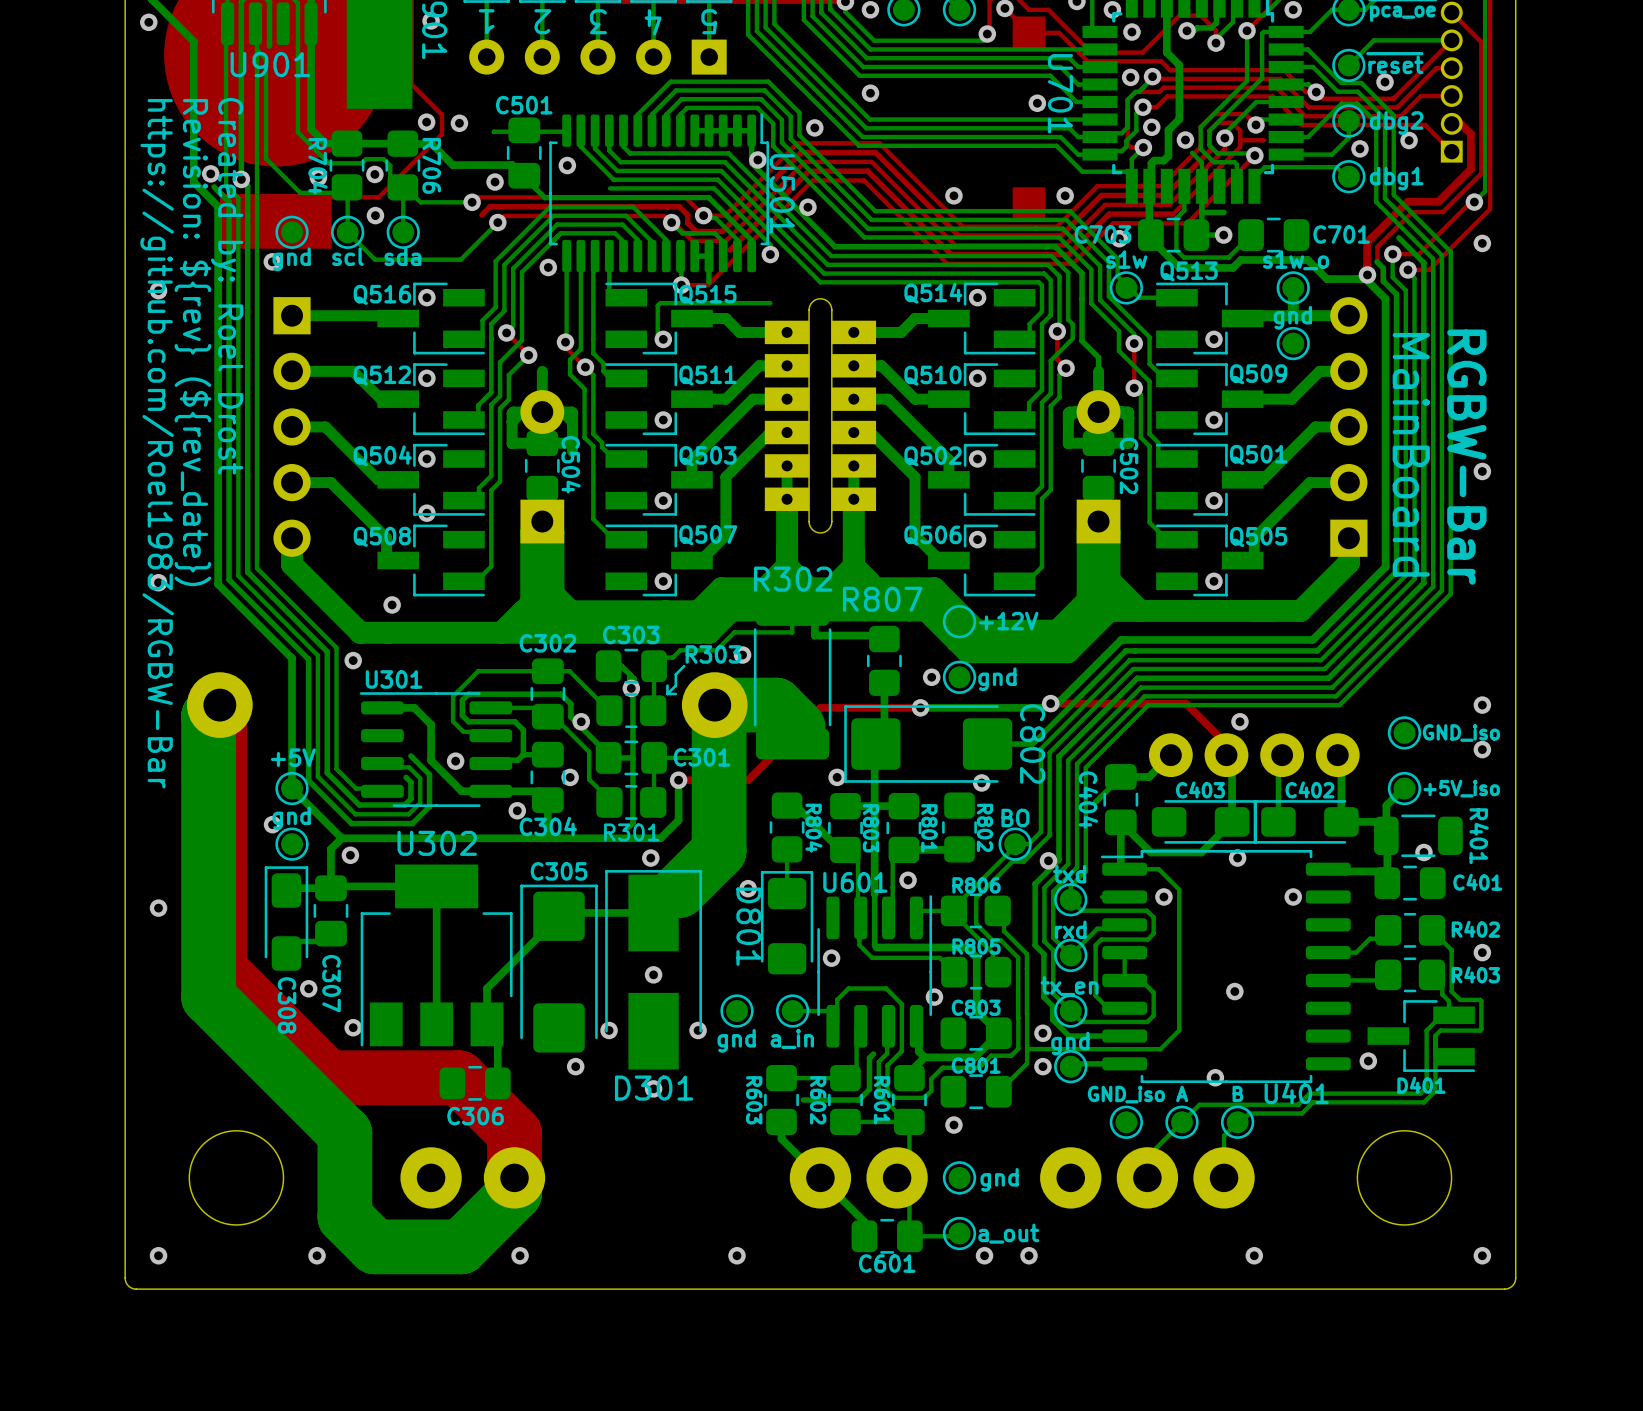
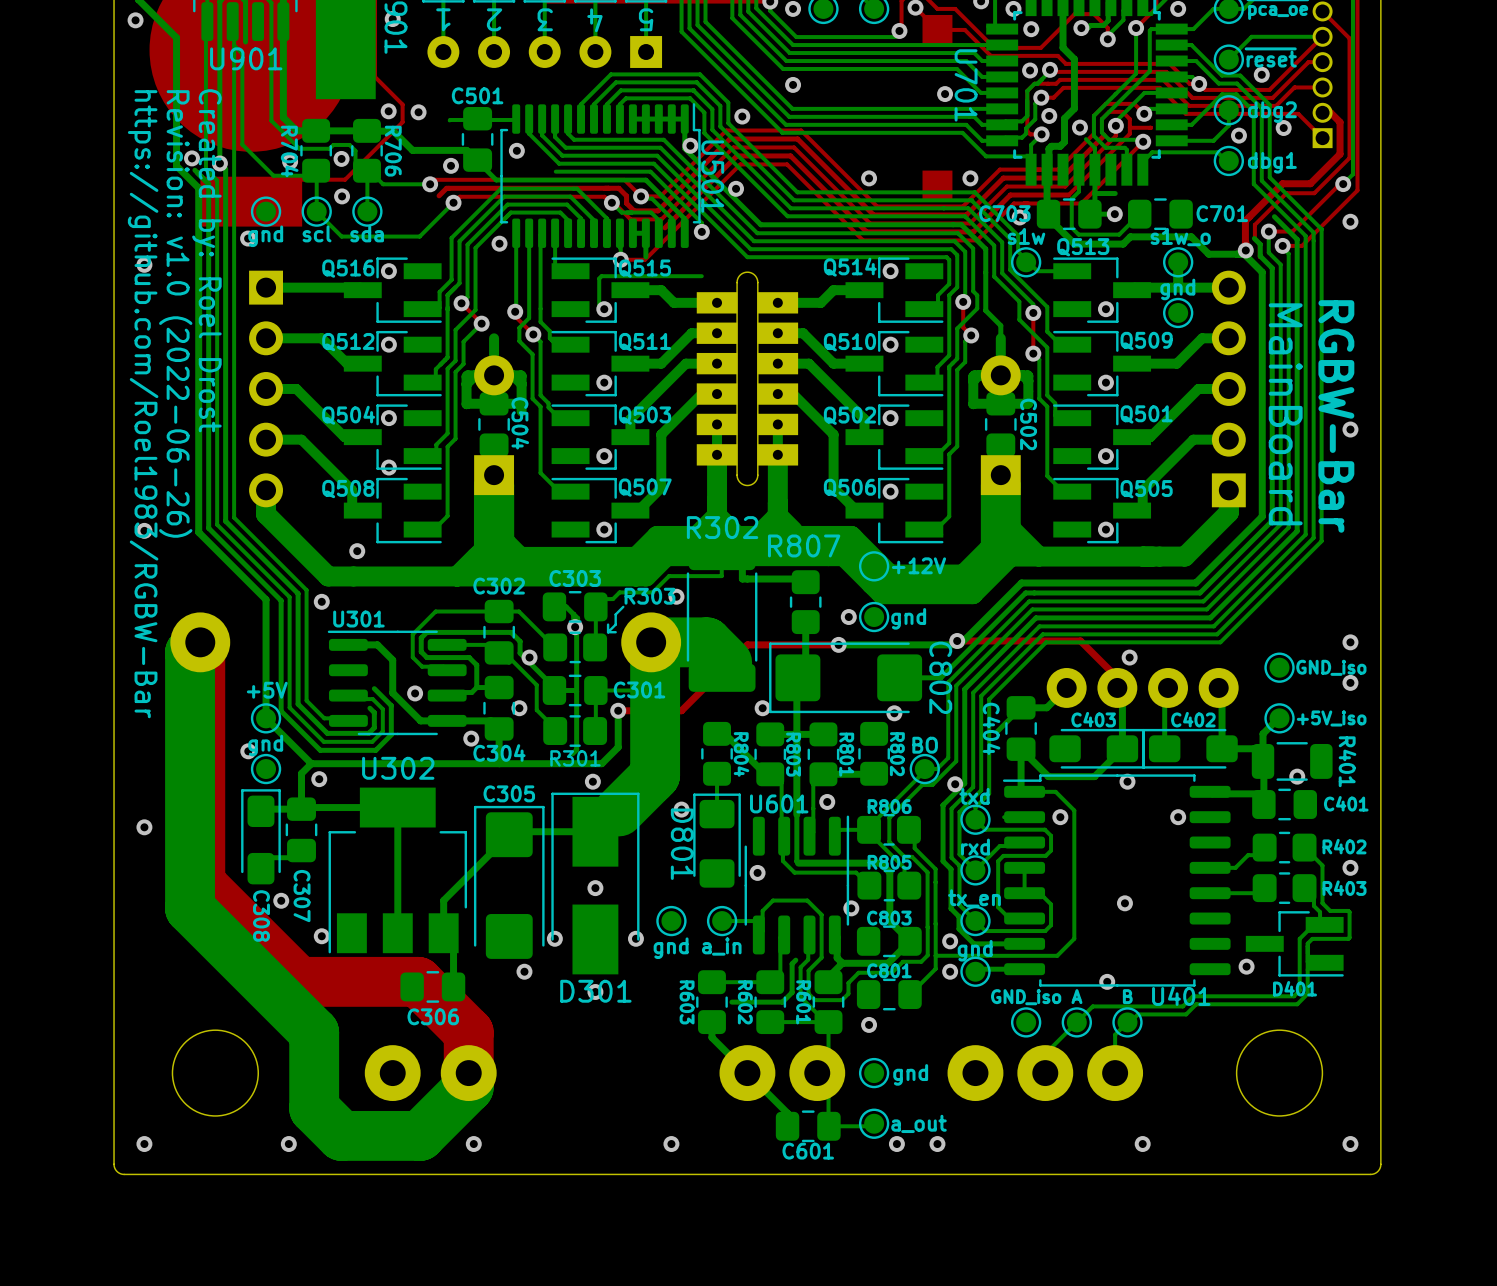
text: Revision: ${rev} (${rev_date}) (192, 342) -> Revision: v1.0 (2022-06-26) (175, 313)

